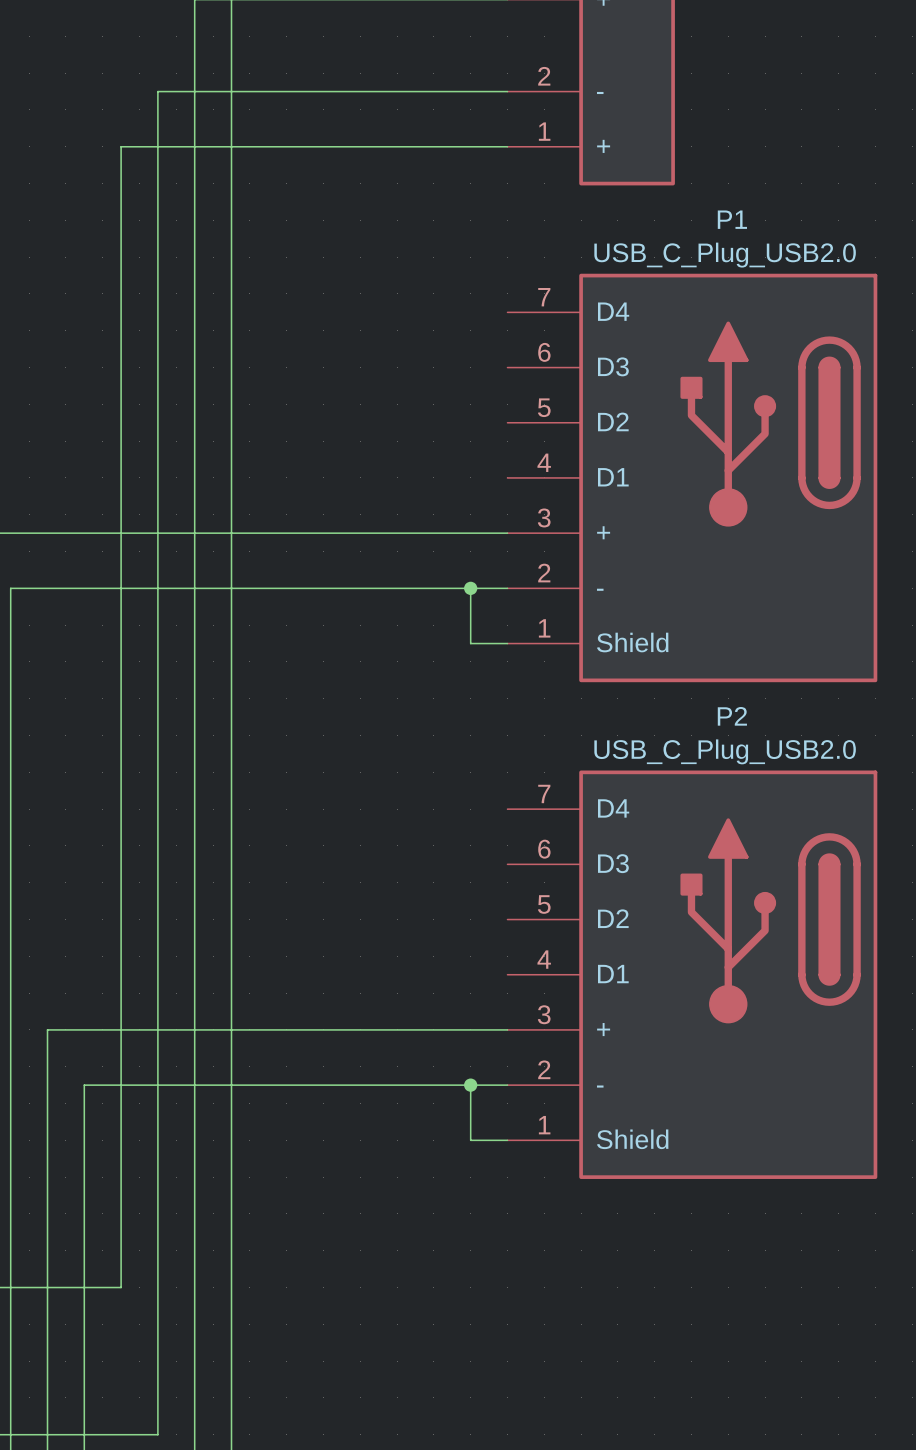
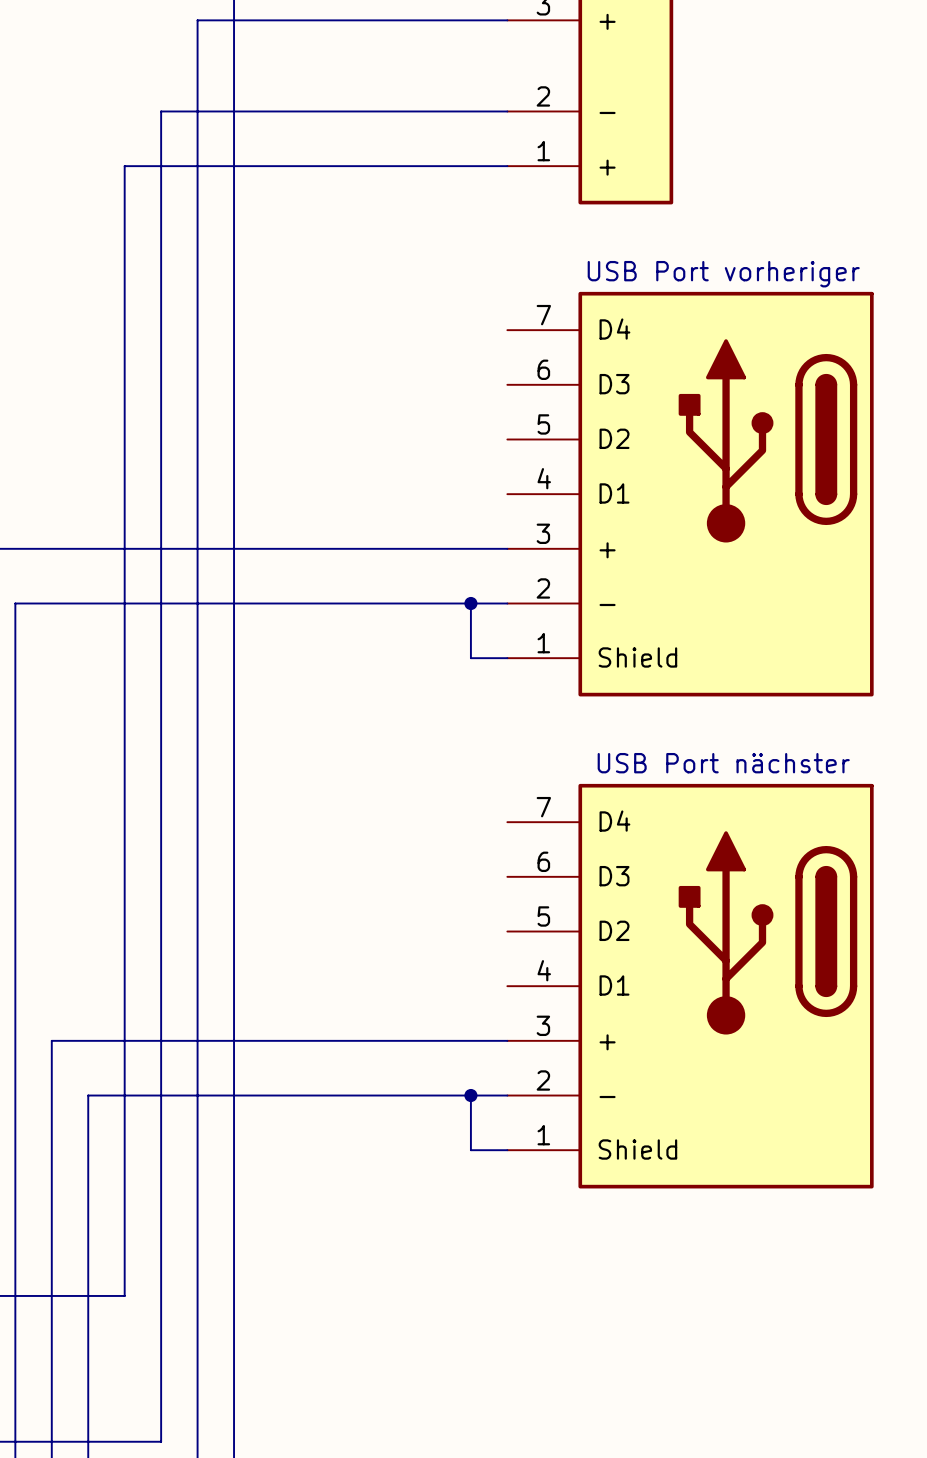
P1 name: P1 (732, 219) -> none
P1 value: USB_C_Plug_USB2.0 (725, 255) -> USB Port vorheriger (723, 274)
P2 name: P2 (732, 716) -> none
P2 value: USB_C_Plug_USB2.0 (725, 751) -> USB Port nächster (723, 763)

